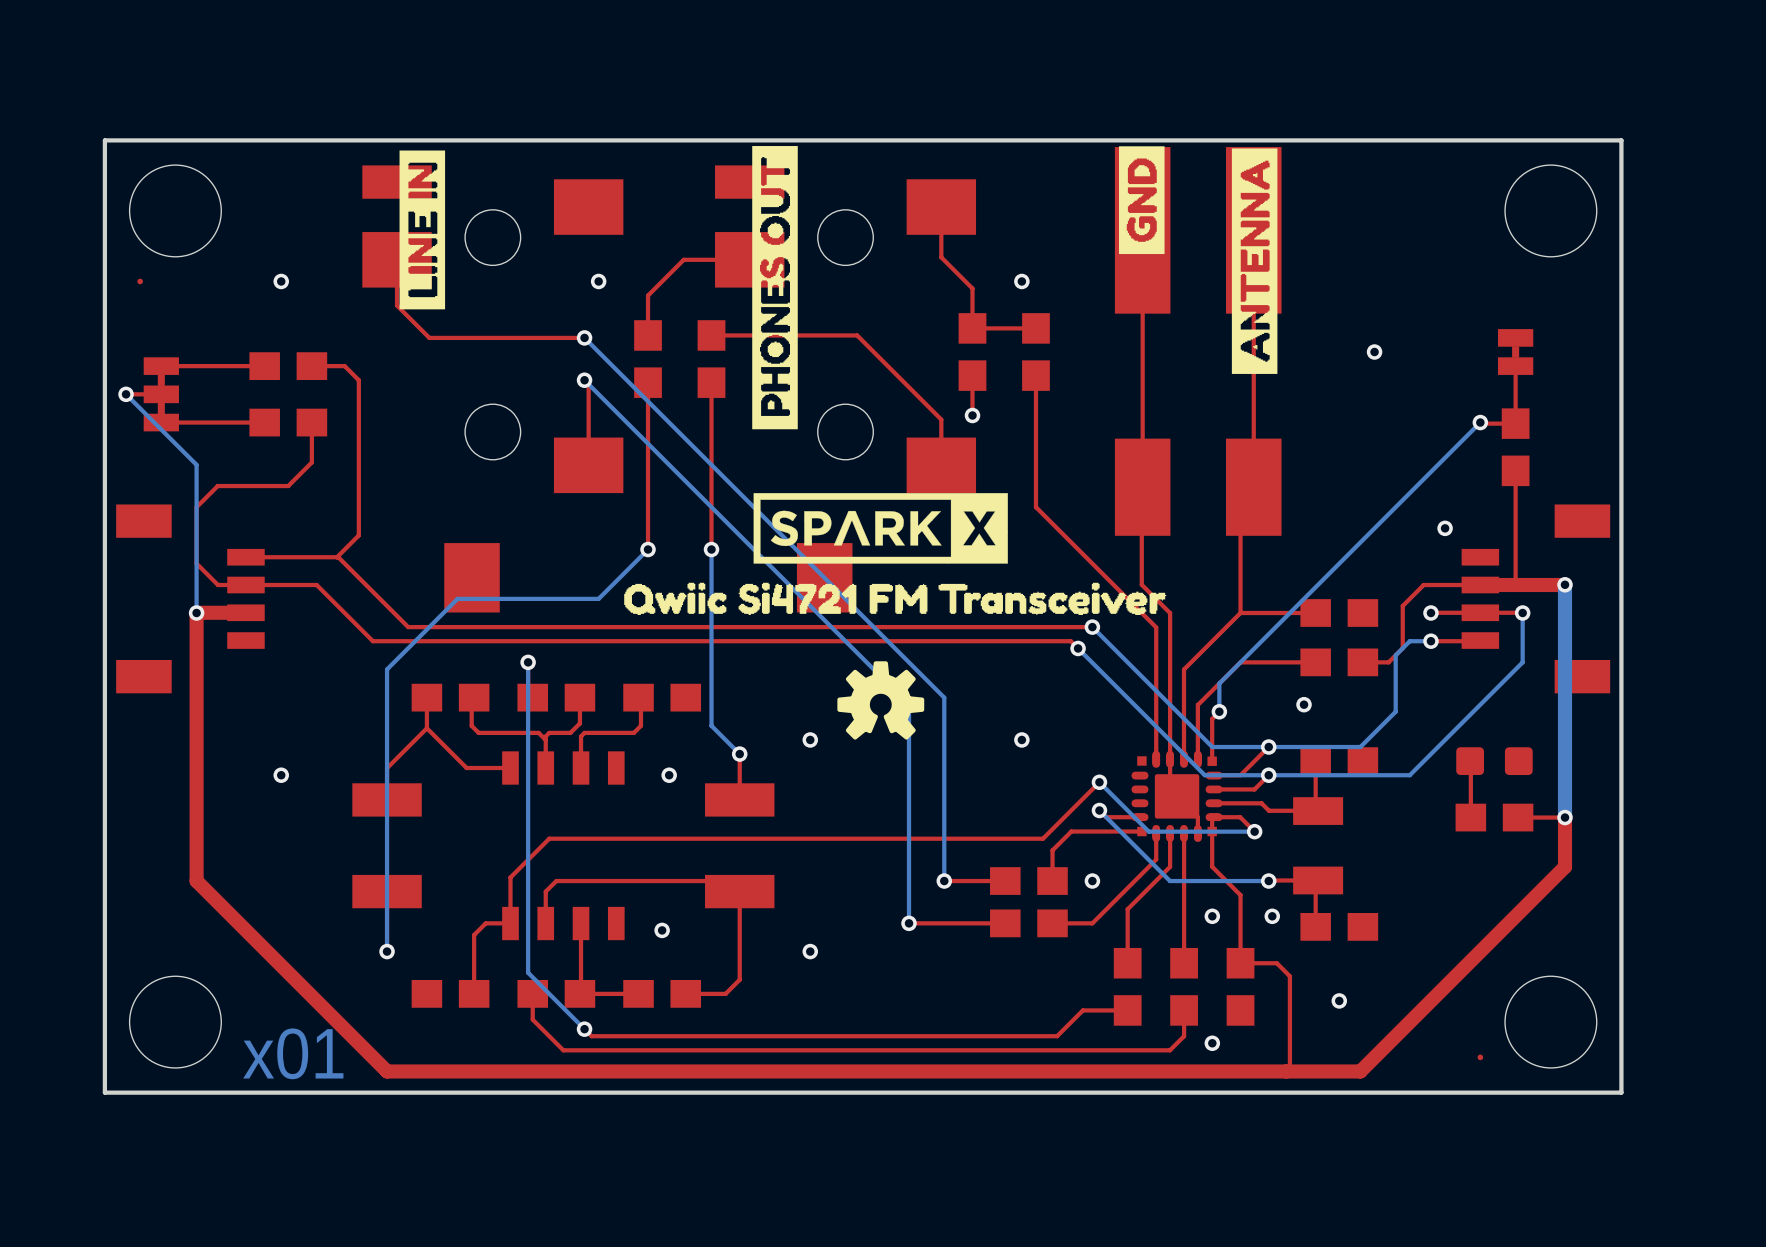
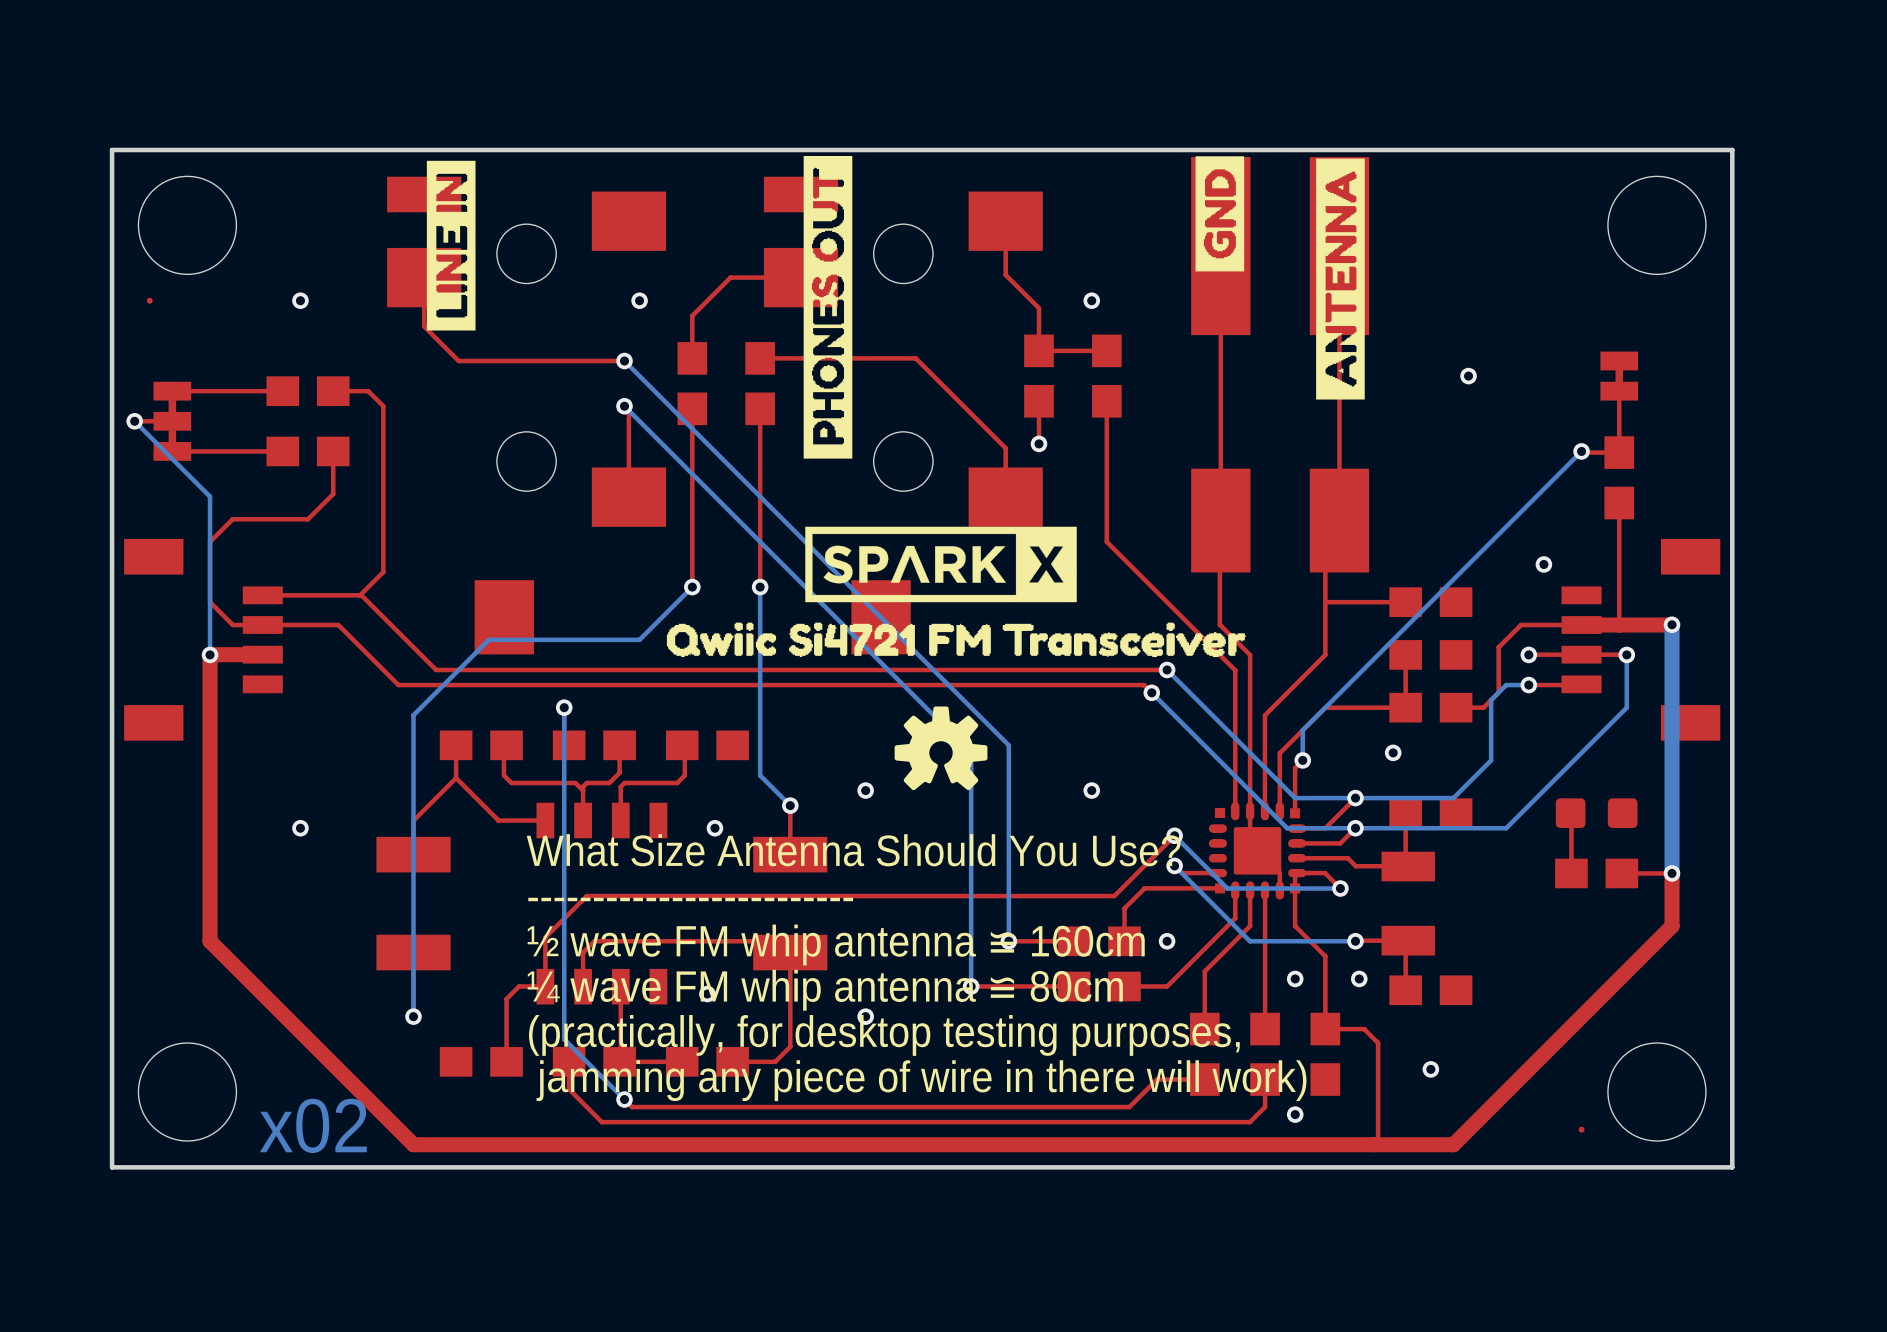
top track: none -> (1405, 602) (1325, 602)
part: none -> (1430, 602)
top track: (1315, 612) (1240, 612) -> (1405, 654) (1405, 707)
text: none -> What Size Antenna Should You Use? (853, 850)
text: none -> ------------------------- (690, 899)
text: none -> ½ wave FM whip antenna ≌ 160cm (836, 945)
text: none -> ¼ wave FM whip antenna ≌ 80cm (825, 990)
text: none -> (practically, for desktop testing purposes, (884, 1035)
text: none -> jamming any piece of wire in there will work) (921, 1080)
text: x01 (293, 1053) -> x02 (313, 1125)

